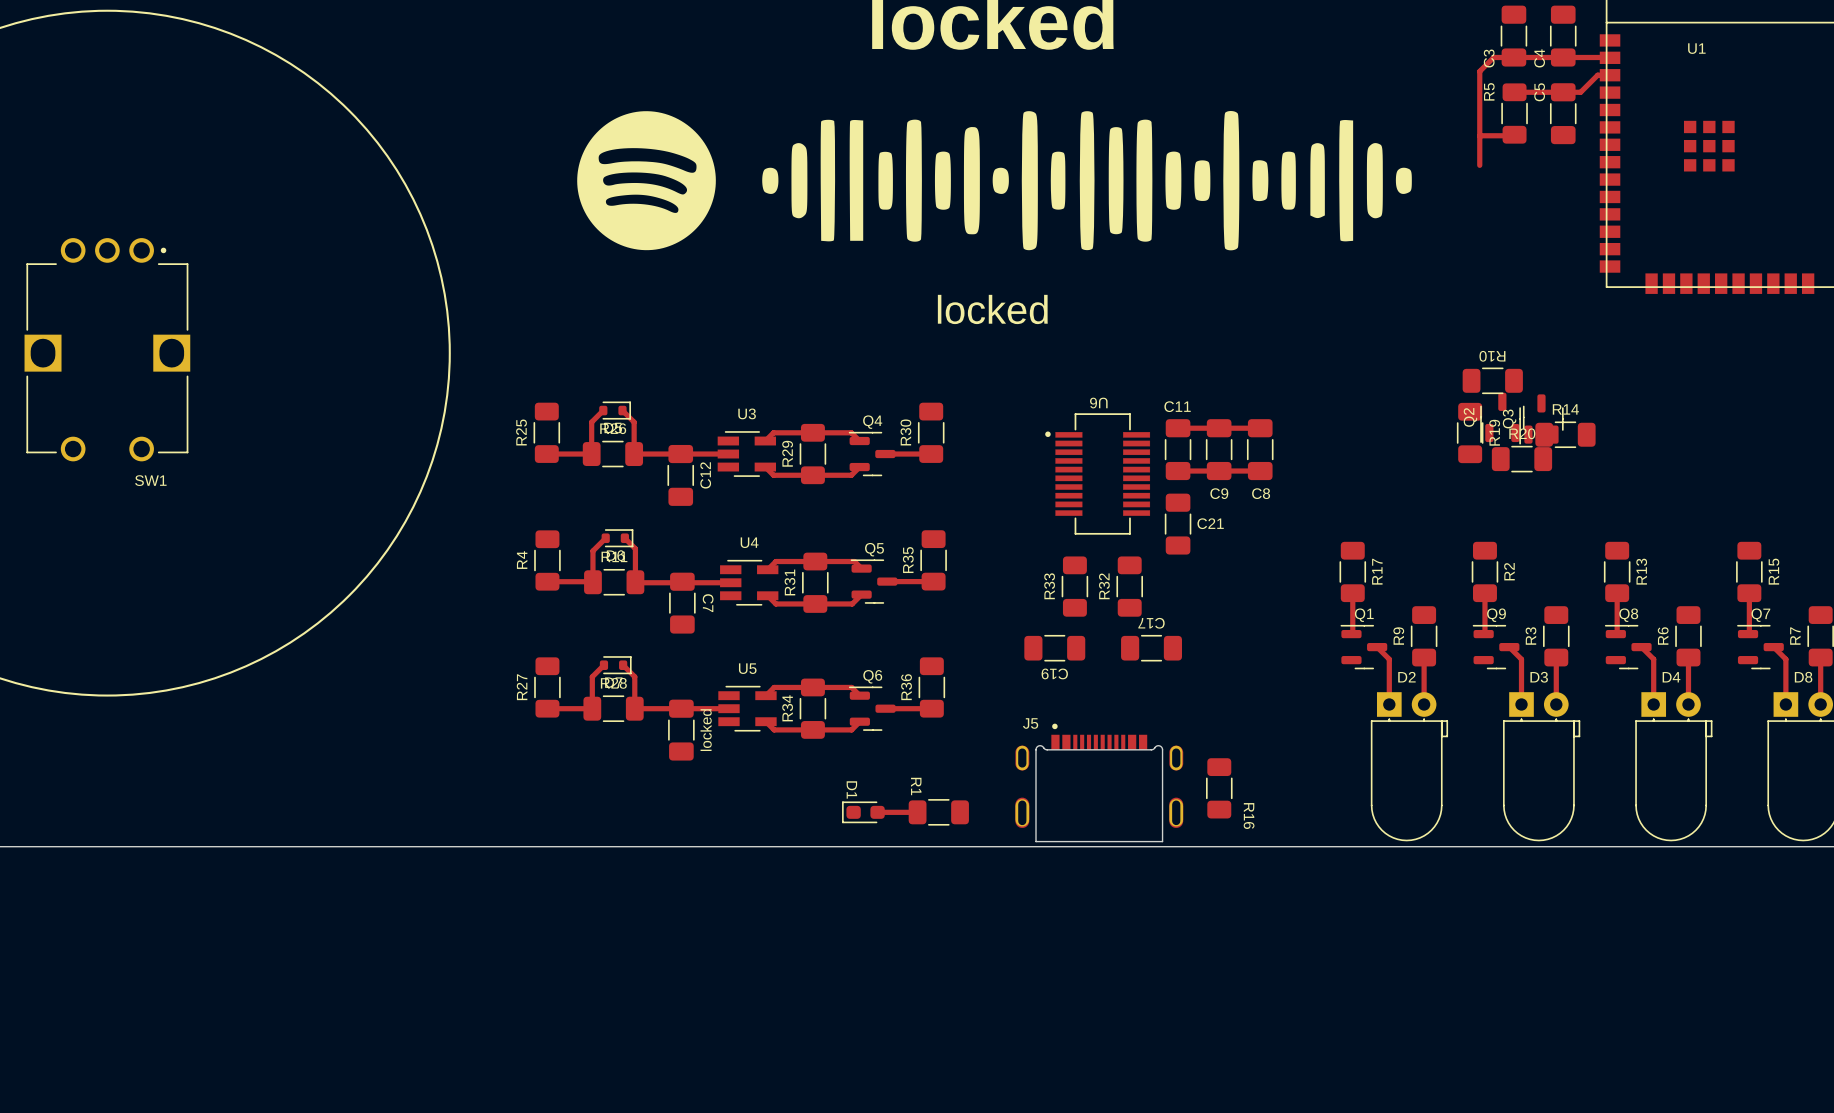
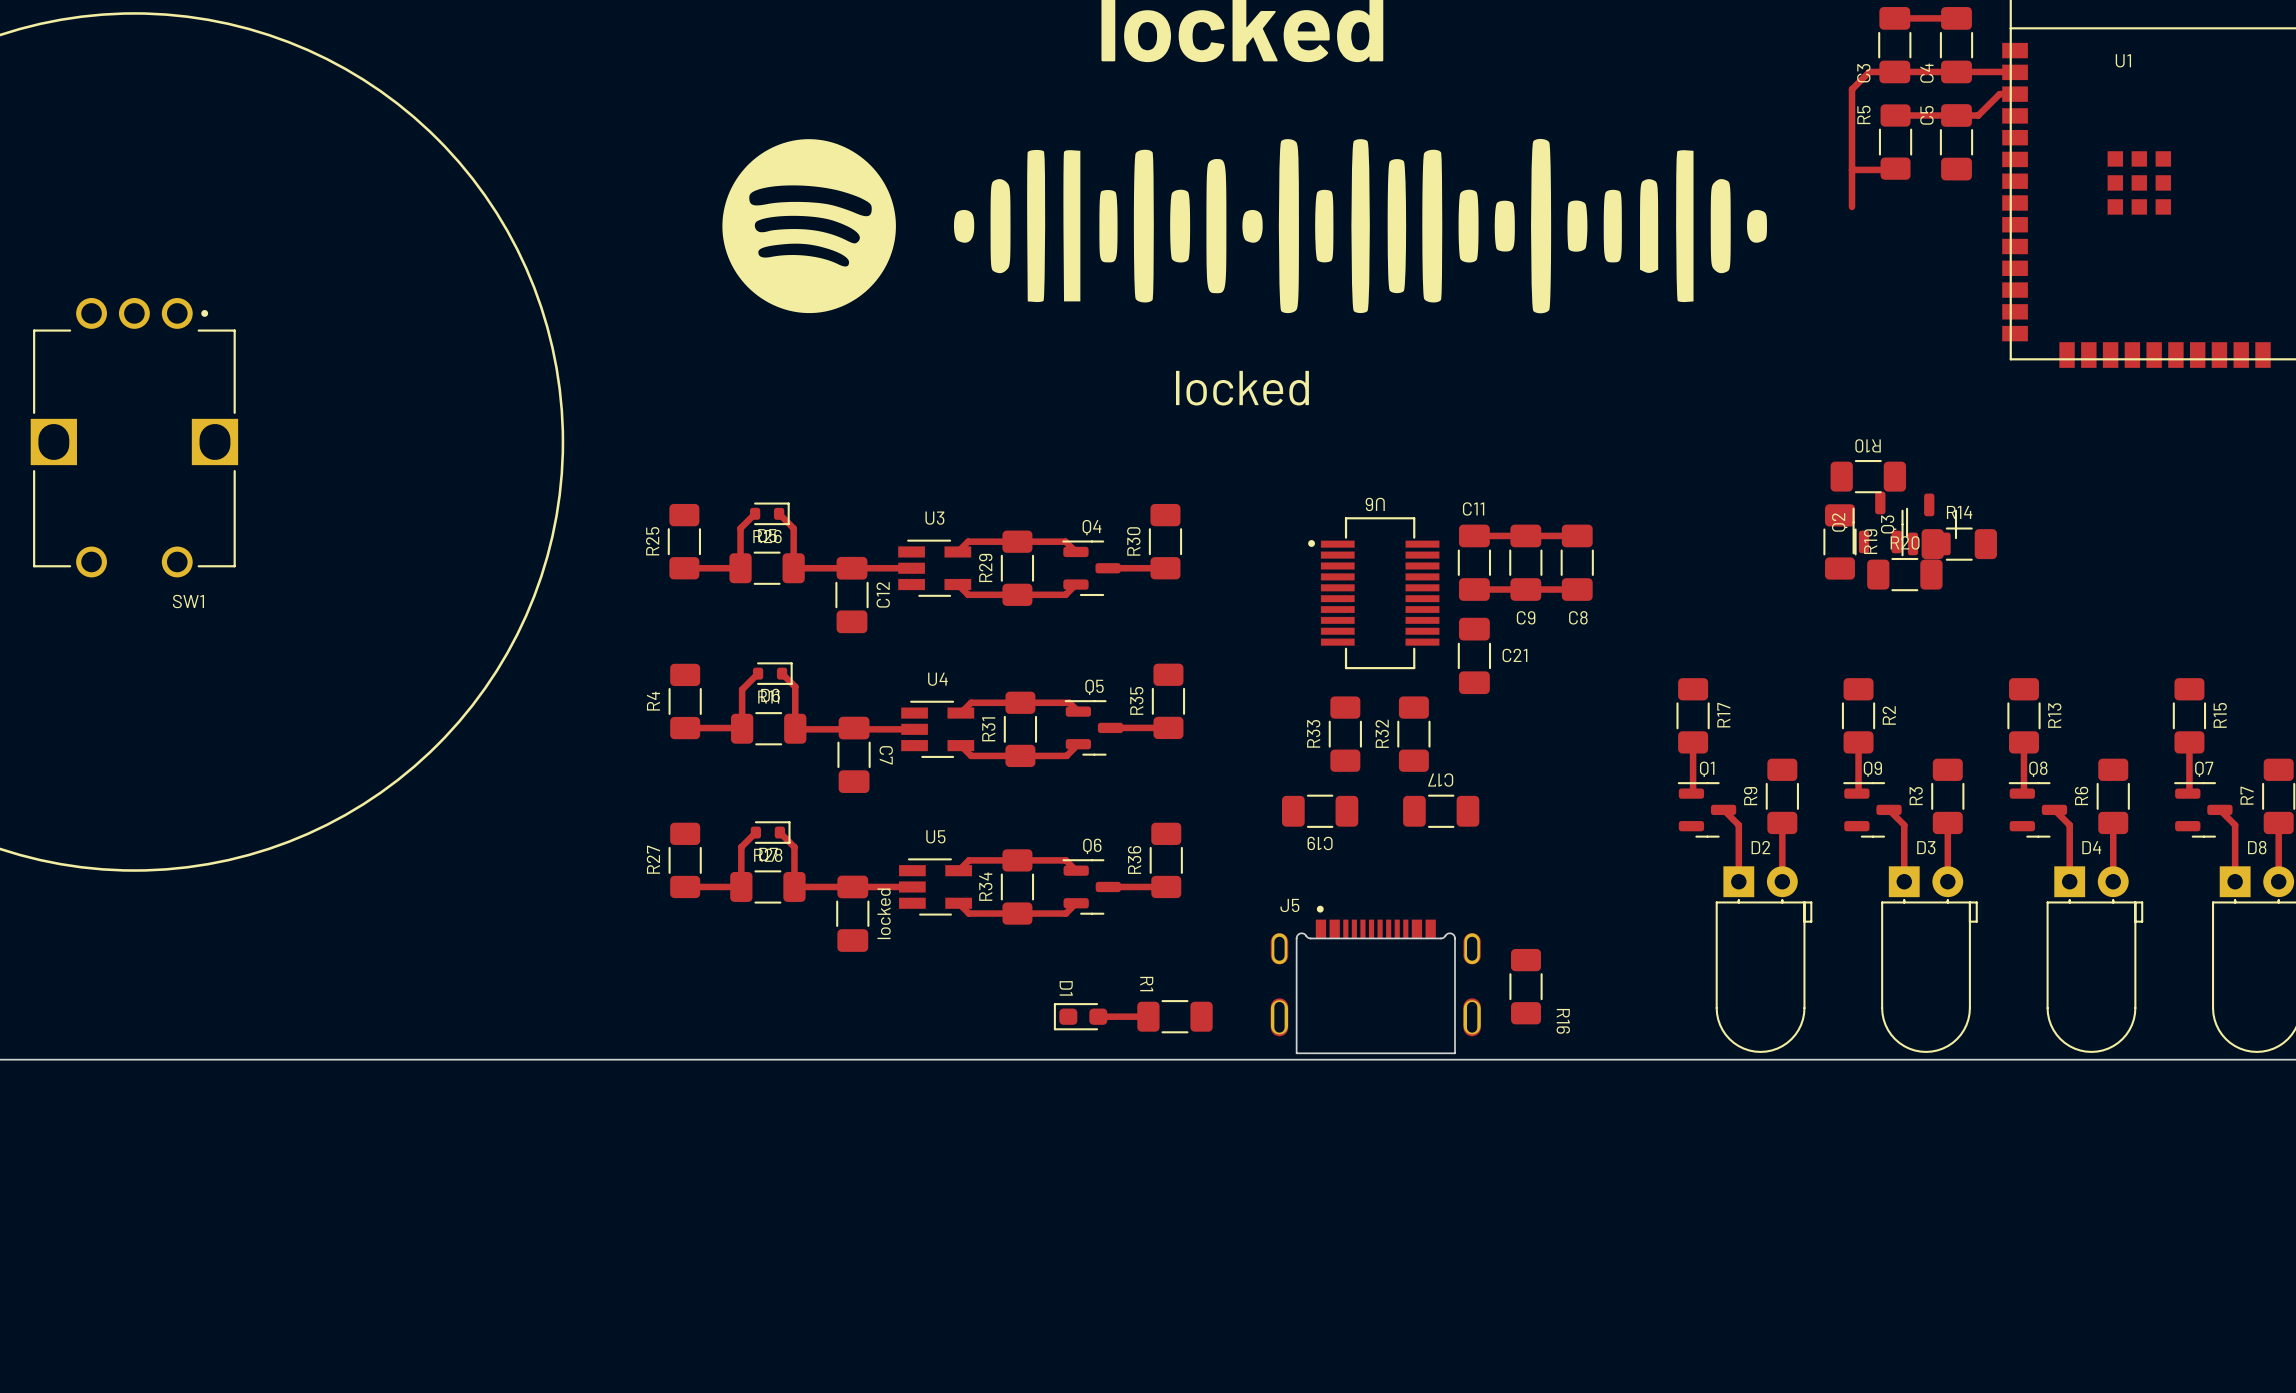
track: none -> (1894, 18) (1956, 18)

